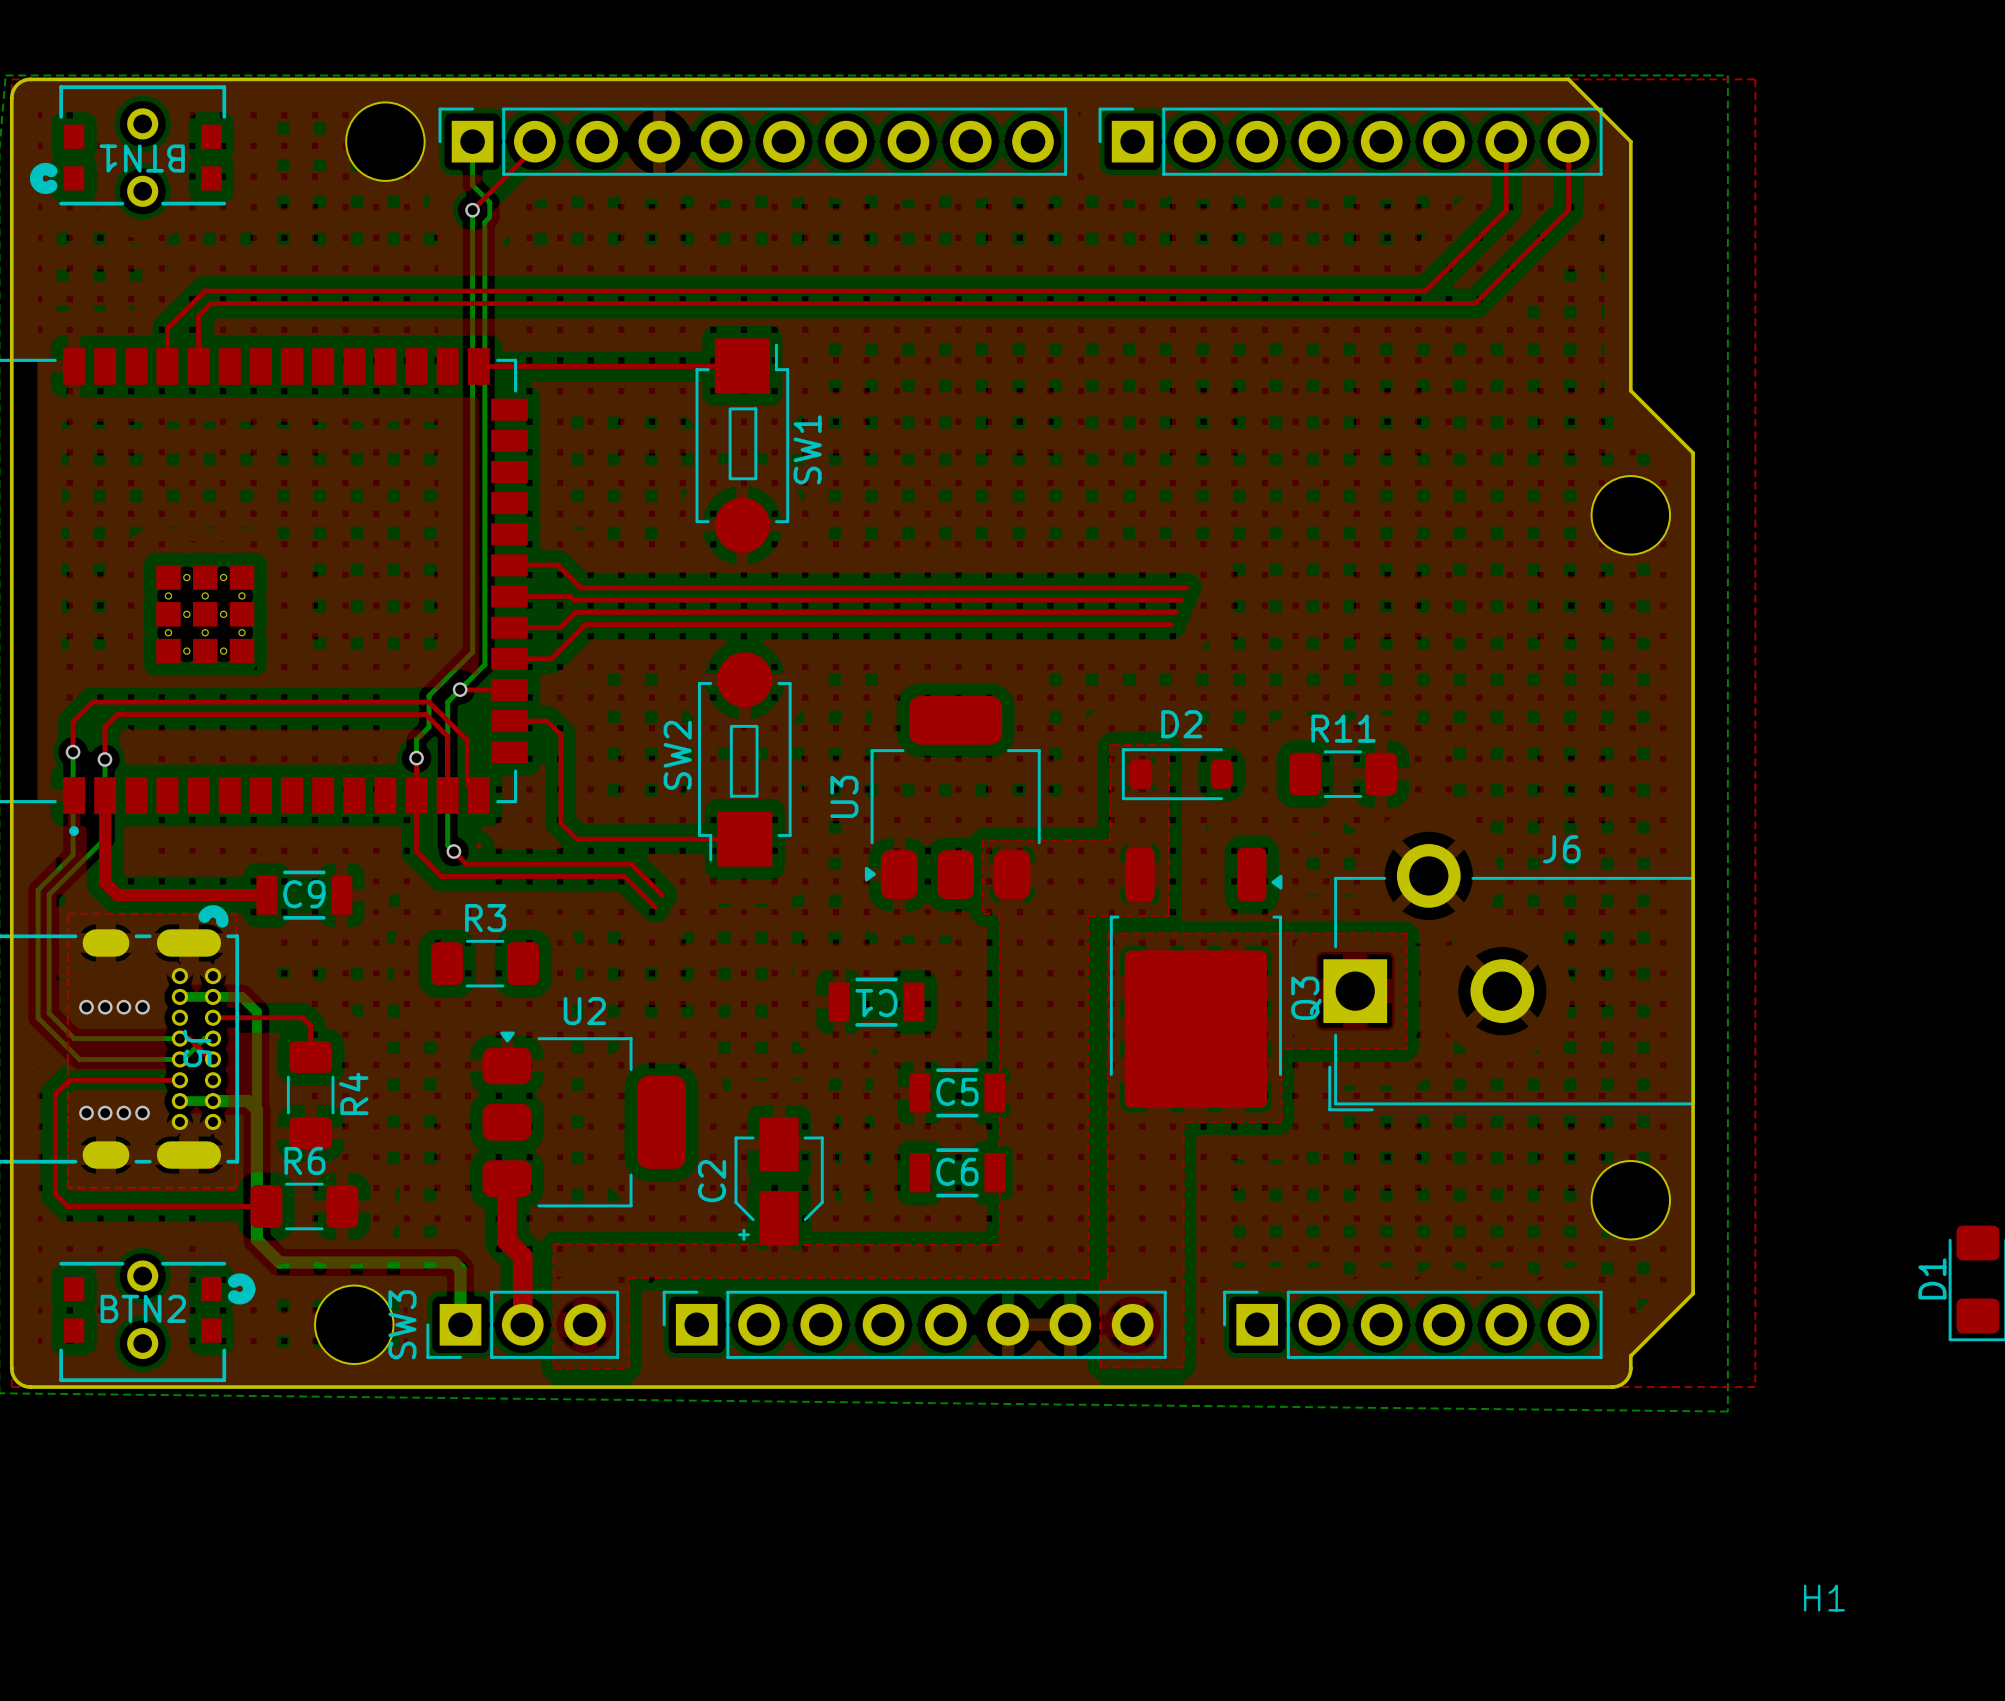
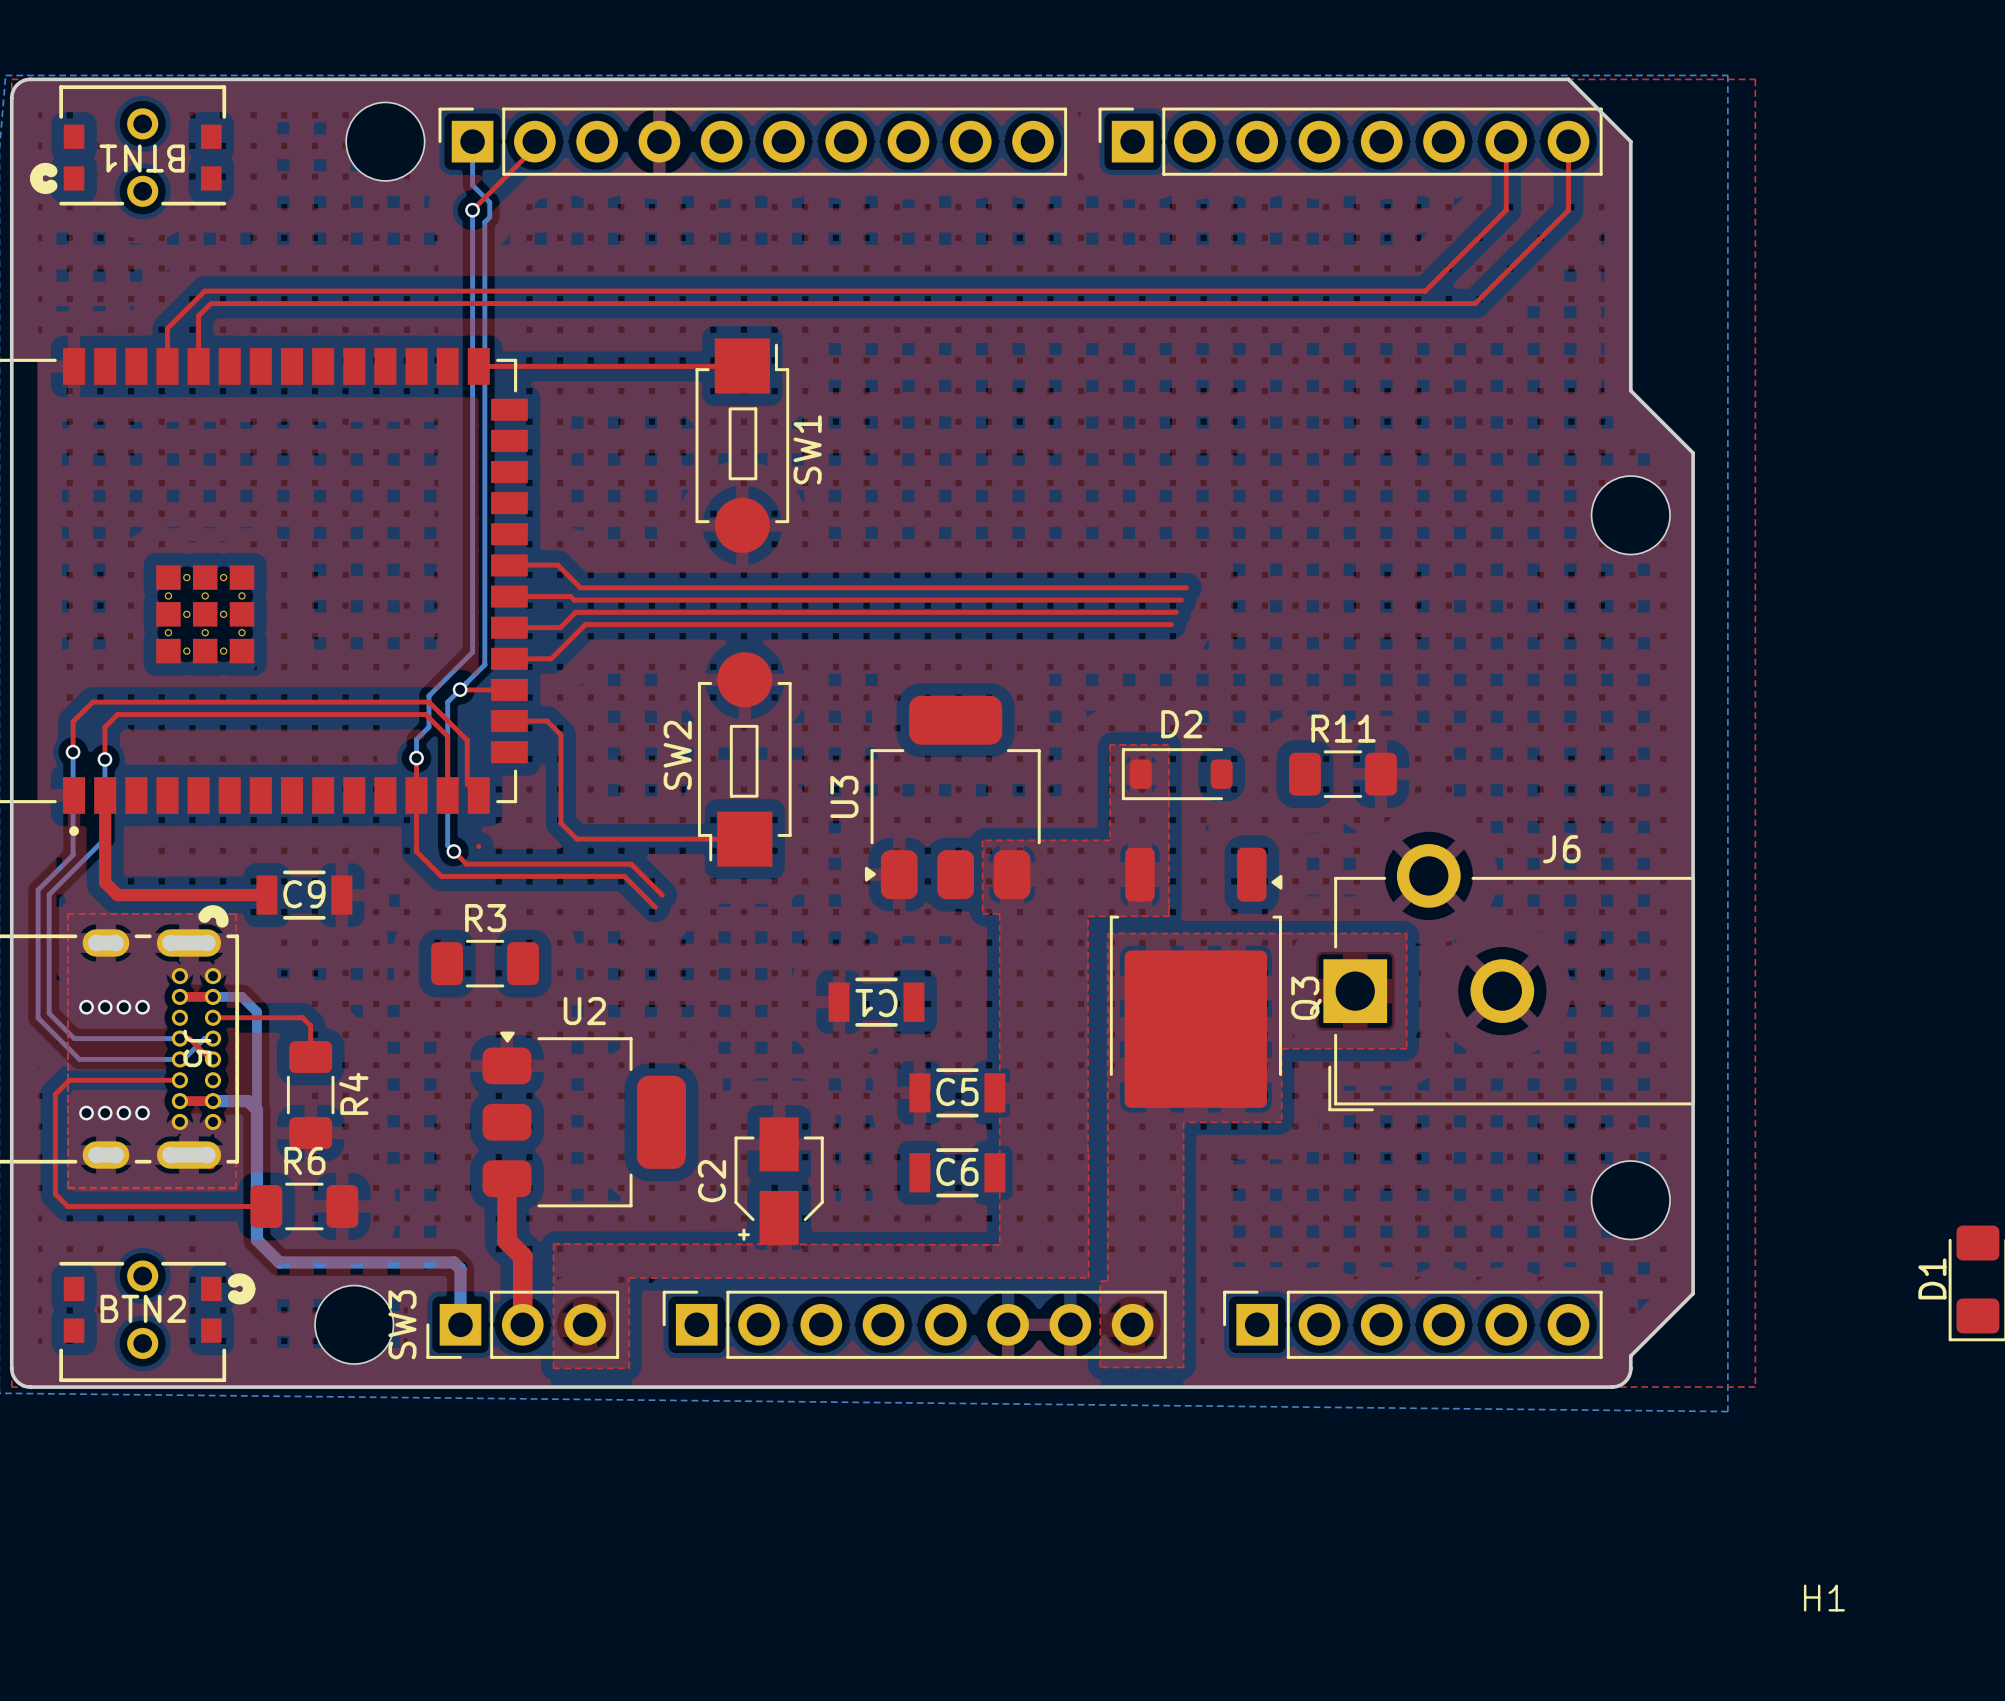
top track: none -> (179, 996) (213, 996)
bottom track: (179, 996) (213, 996) -> none
top track: none -> (179, 1101) (213, 1101)
bottom track: (179, 1101) (213, 1101) -> none

